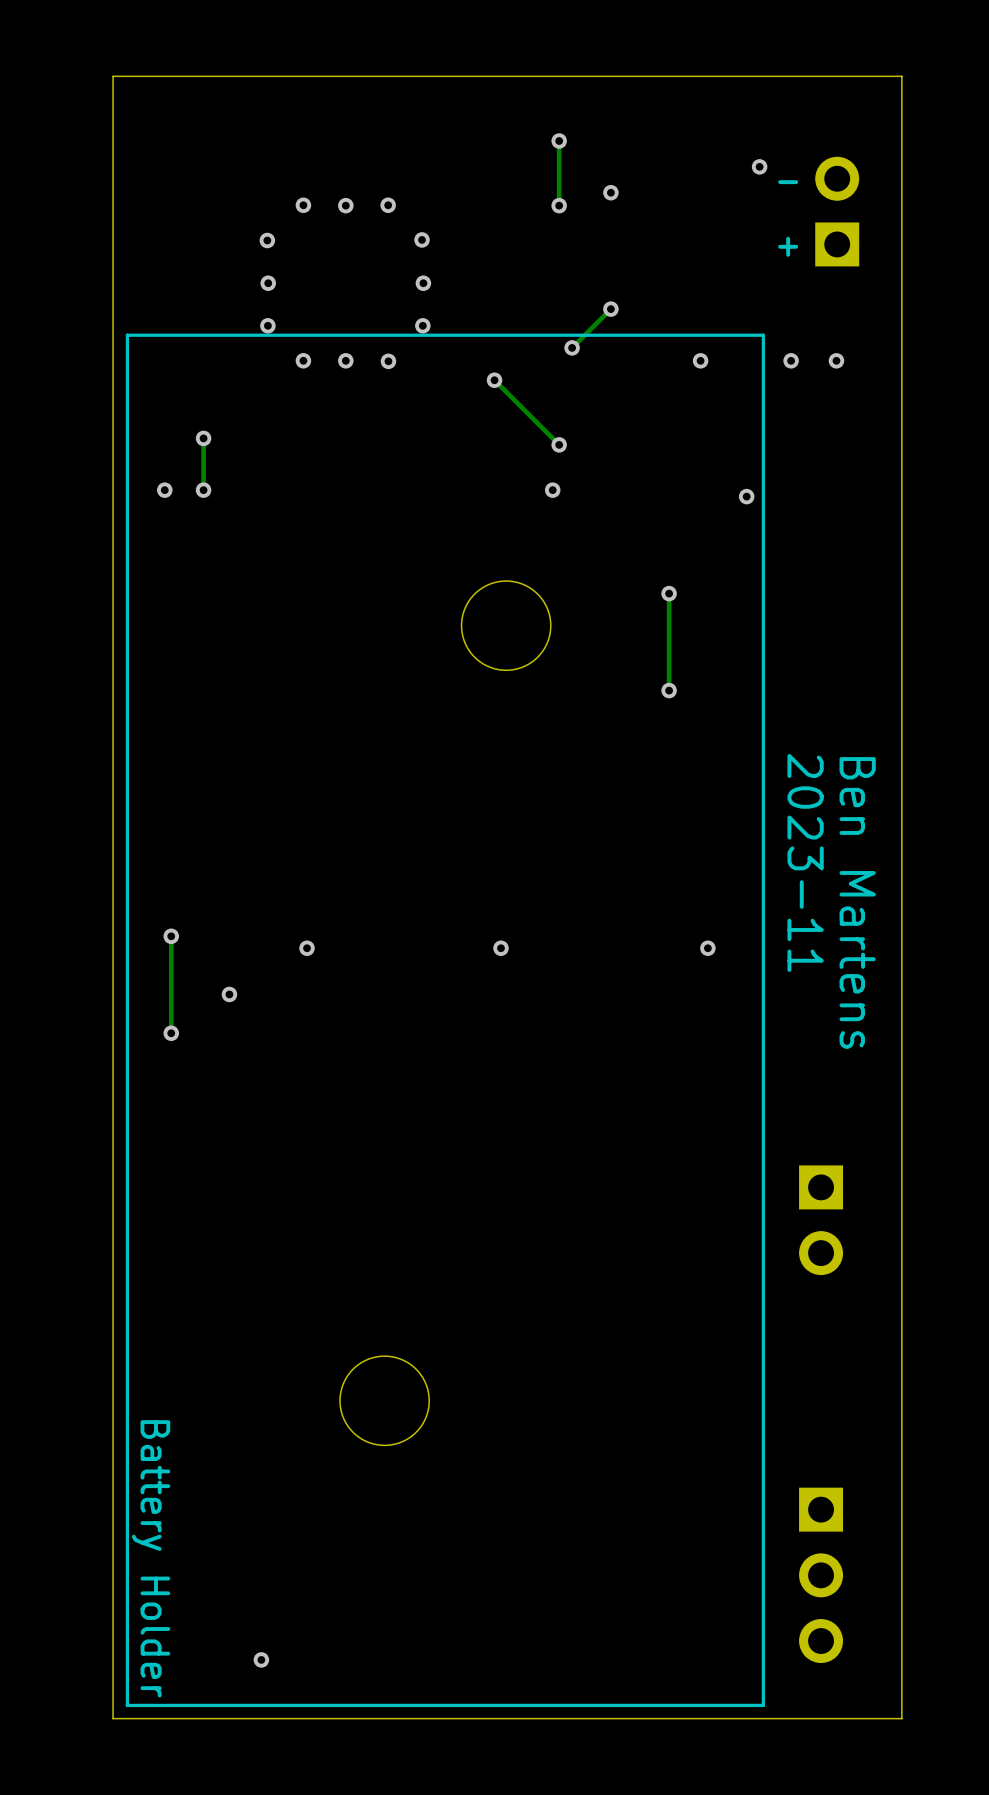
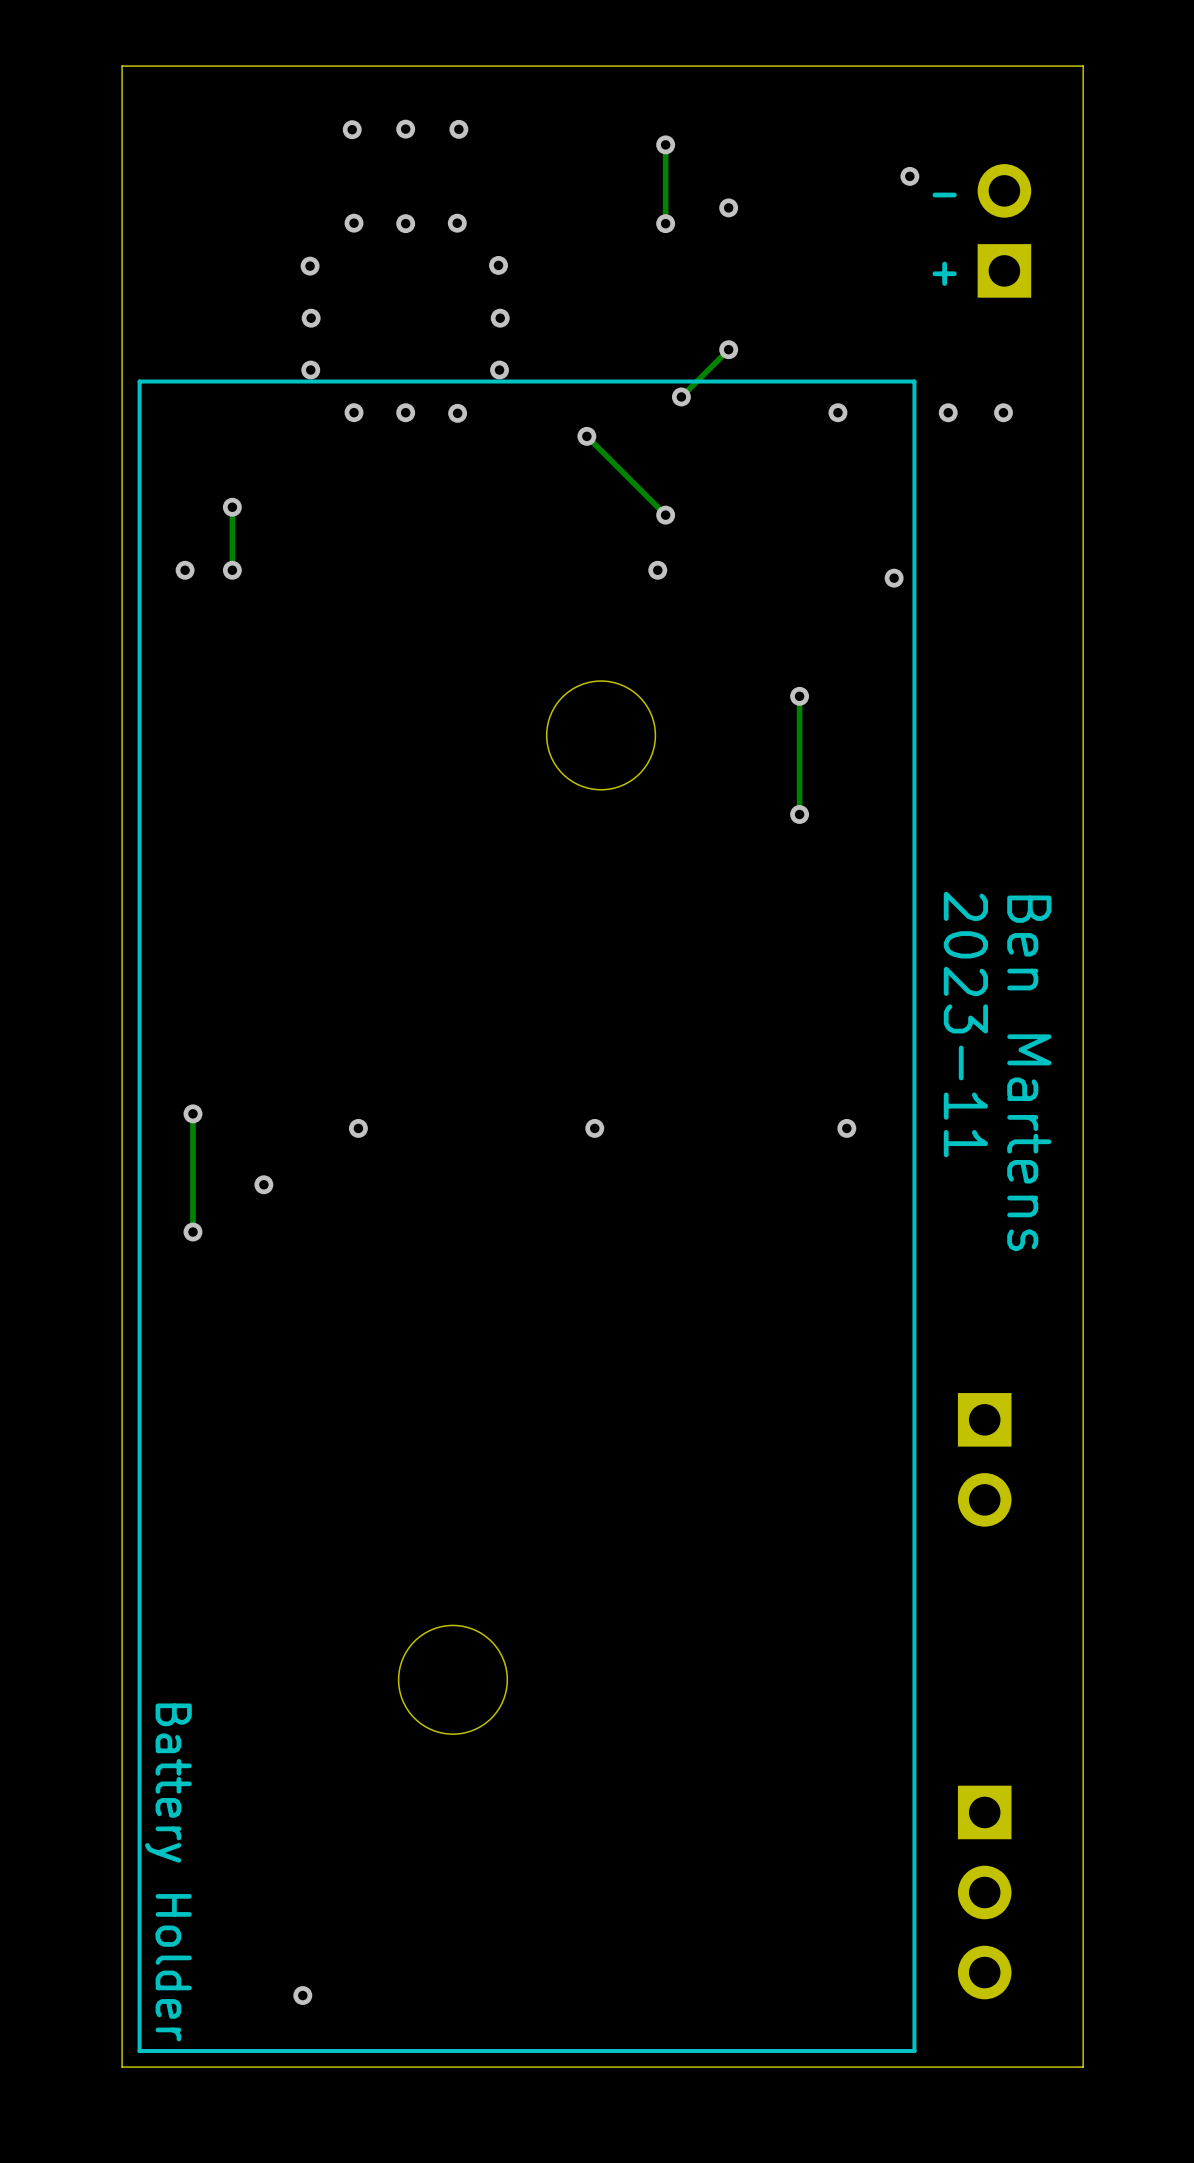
via: none -> (352, 129)
via: none -> (405, 129)
via: none -> (458, 129)

